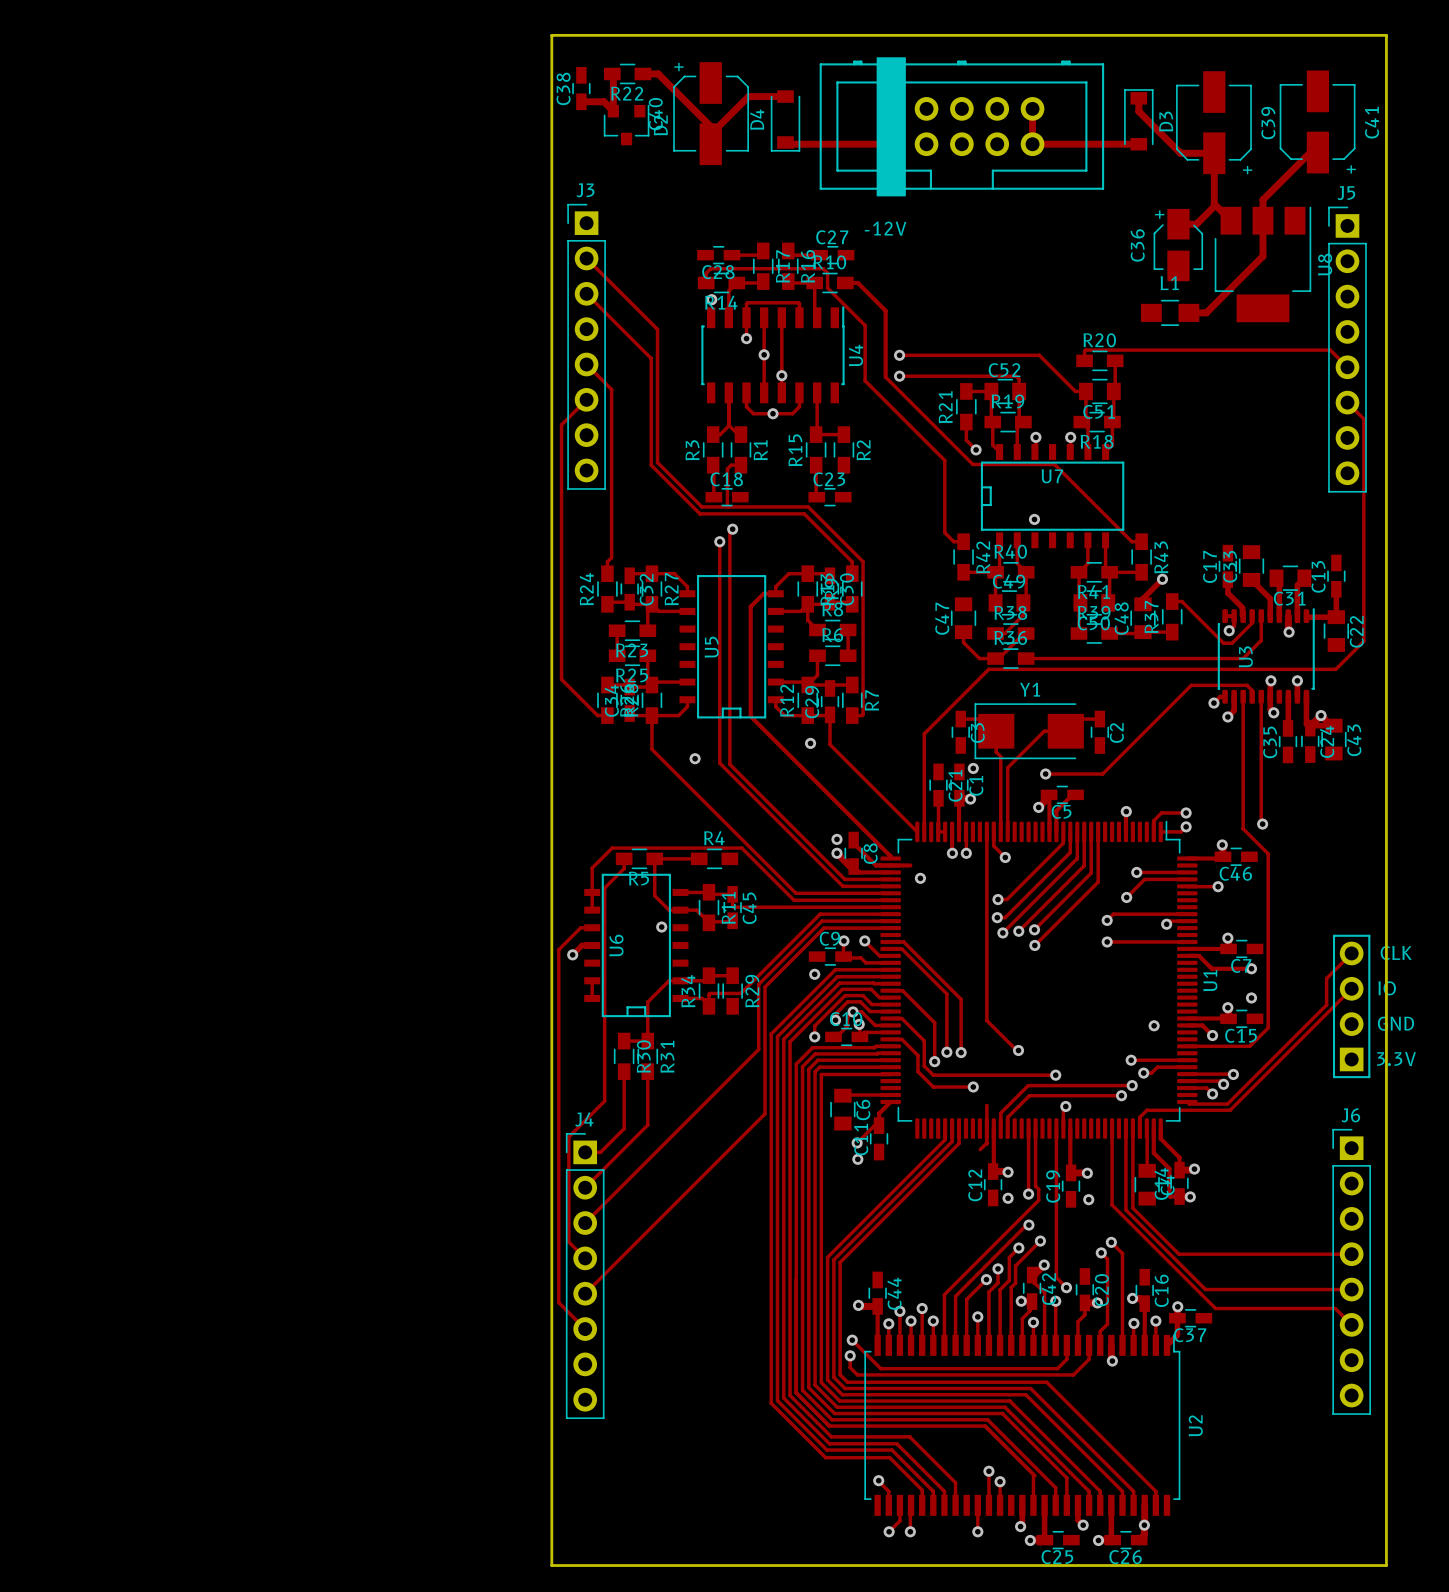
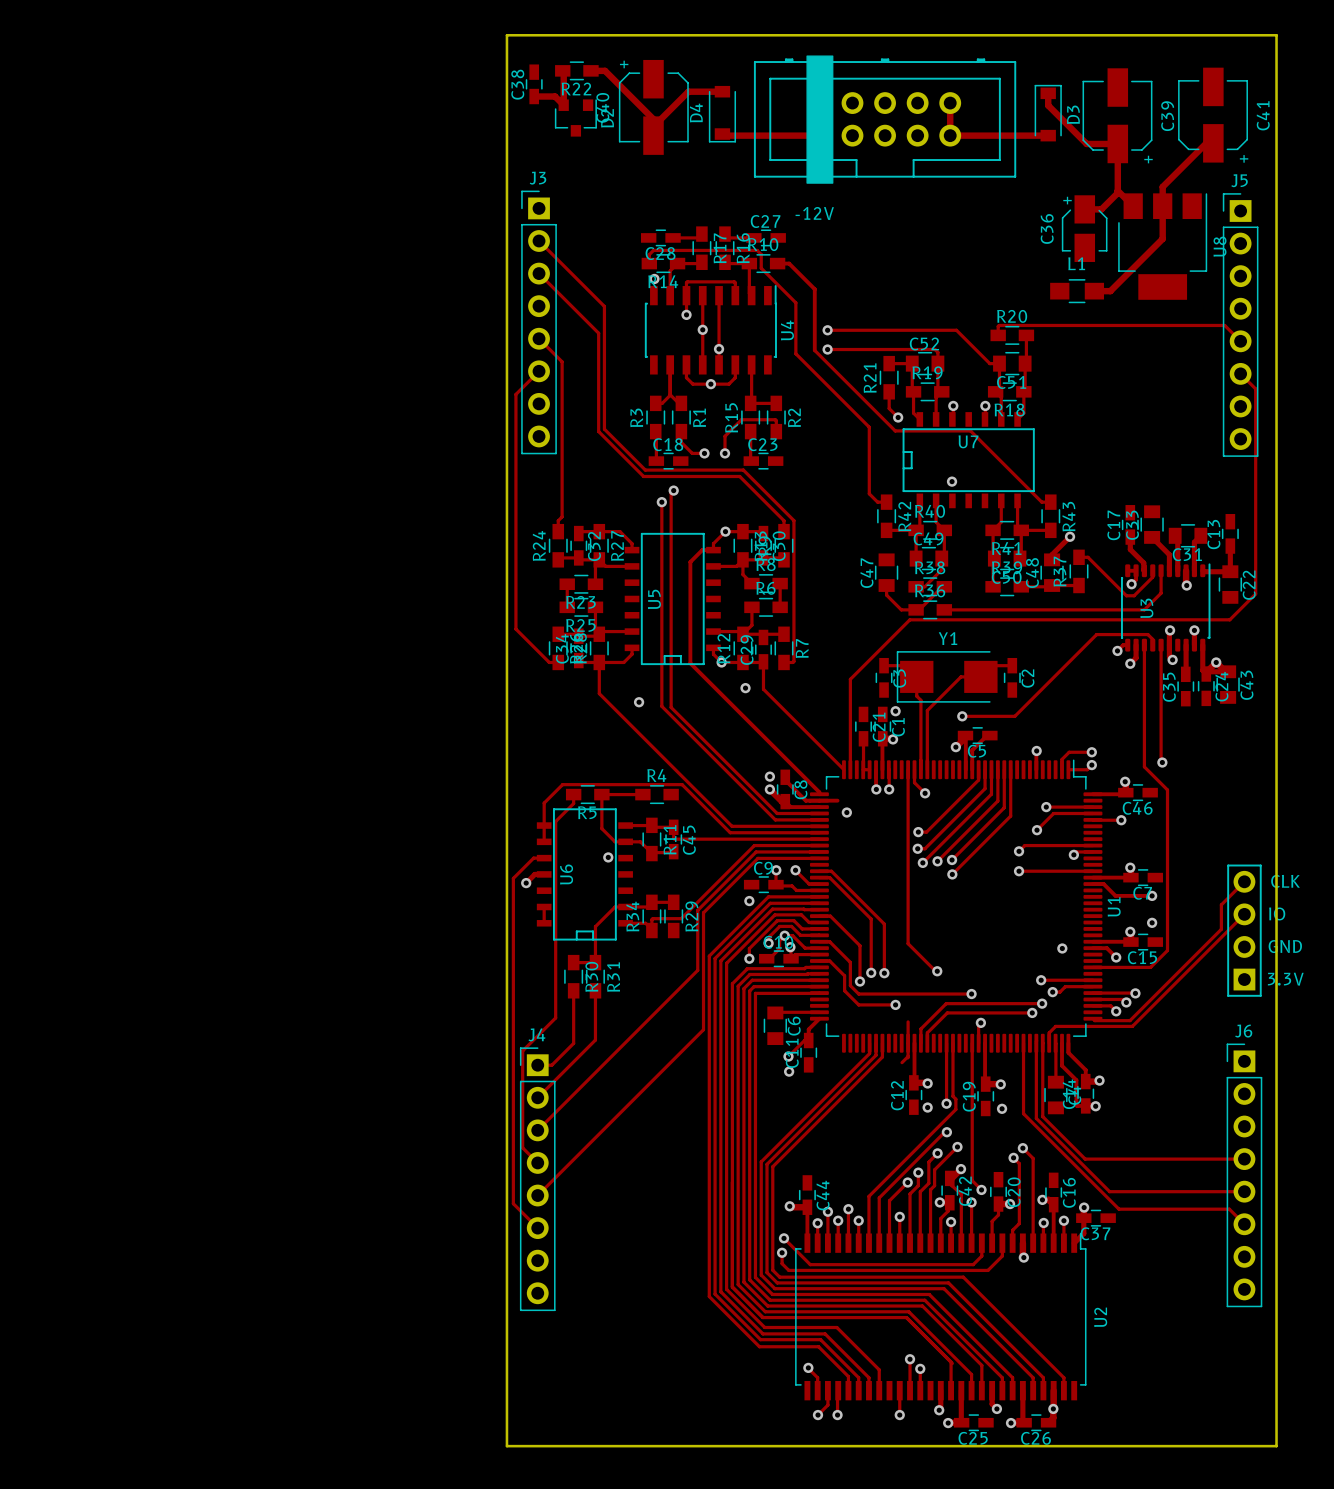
track: (740, 465) (731, 465) (727, 469) (728, 506) -> (681, 431) (681, 442) (692, 453) (704, 453)
track: none -> (776, 431) (775, 419) (741, 419) (725, 436) (725, 453)
via: none -> (704, 453)
via: none -> (725, 453)
via: none -> (725, 531)
via: none -> (721, 662)

